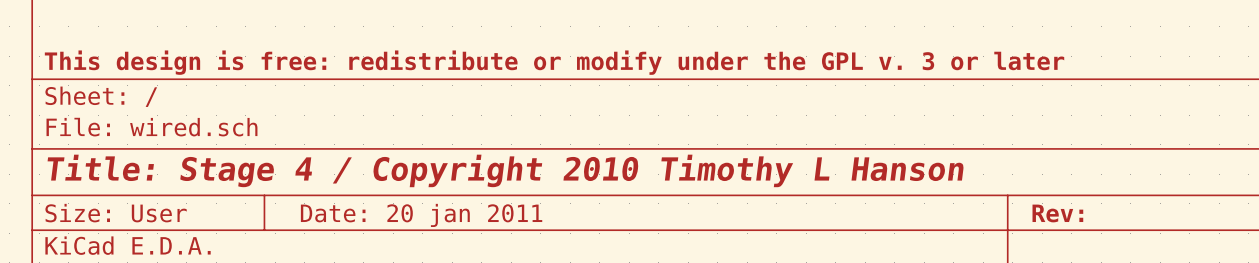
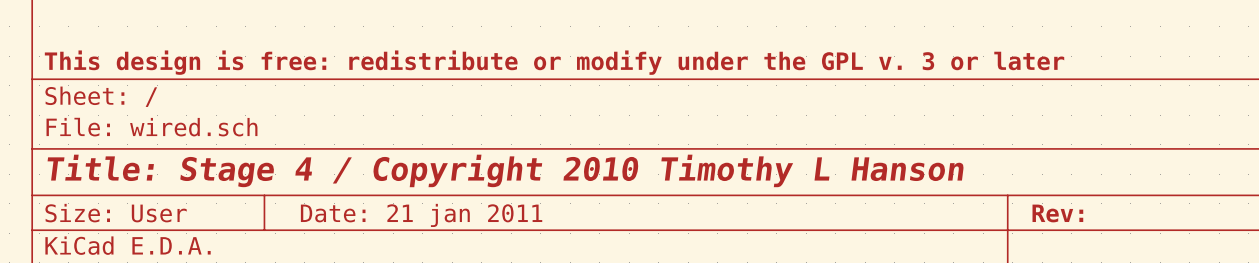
title block: Date: 20 jan 2011 (421, 215) -> Date: 21 jan 2011 (421, 215)

